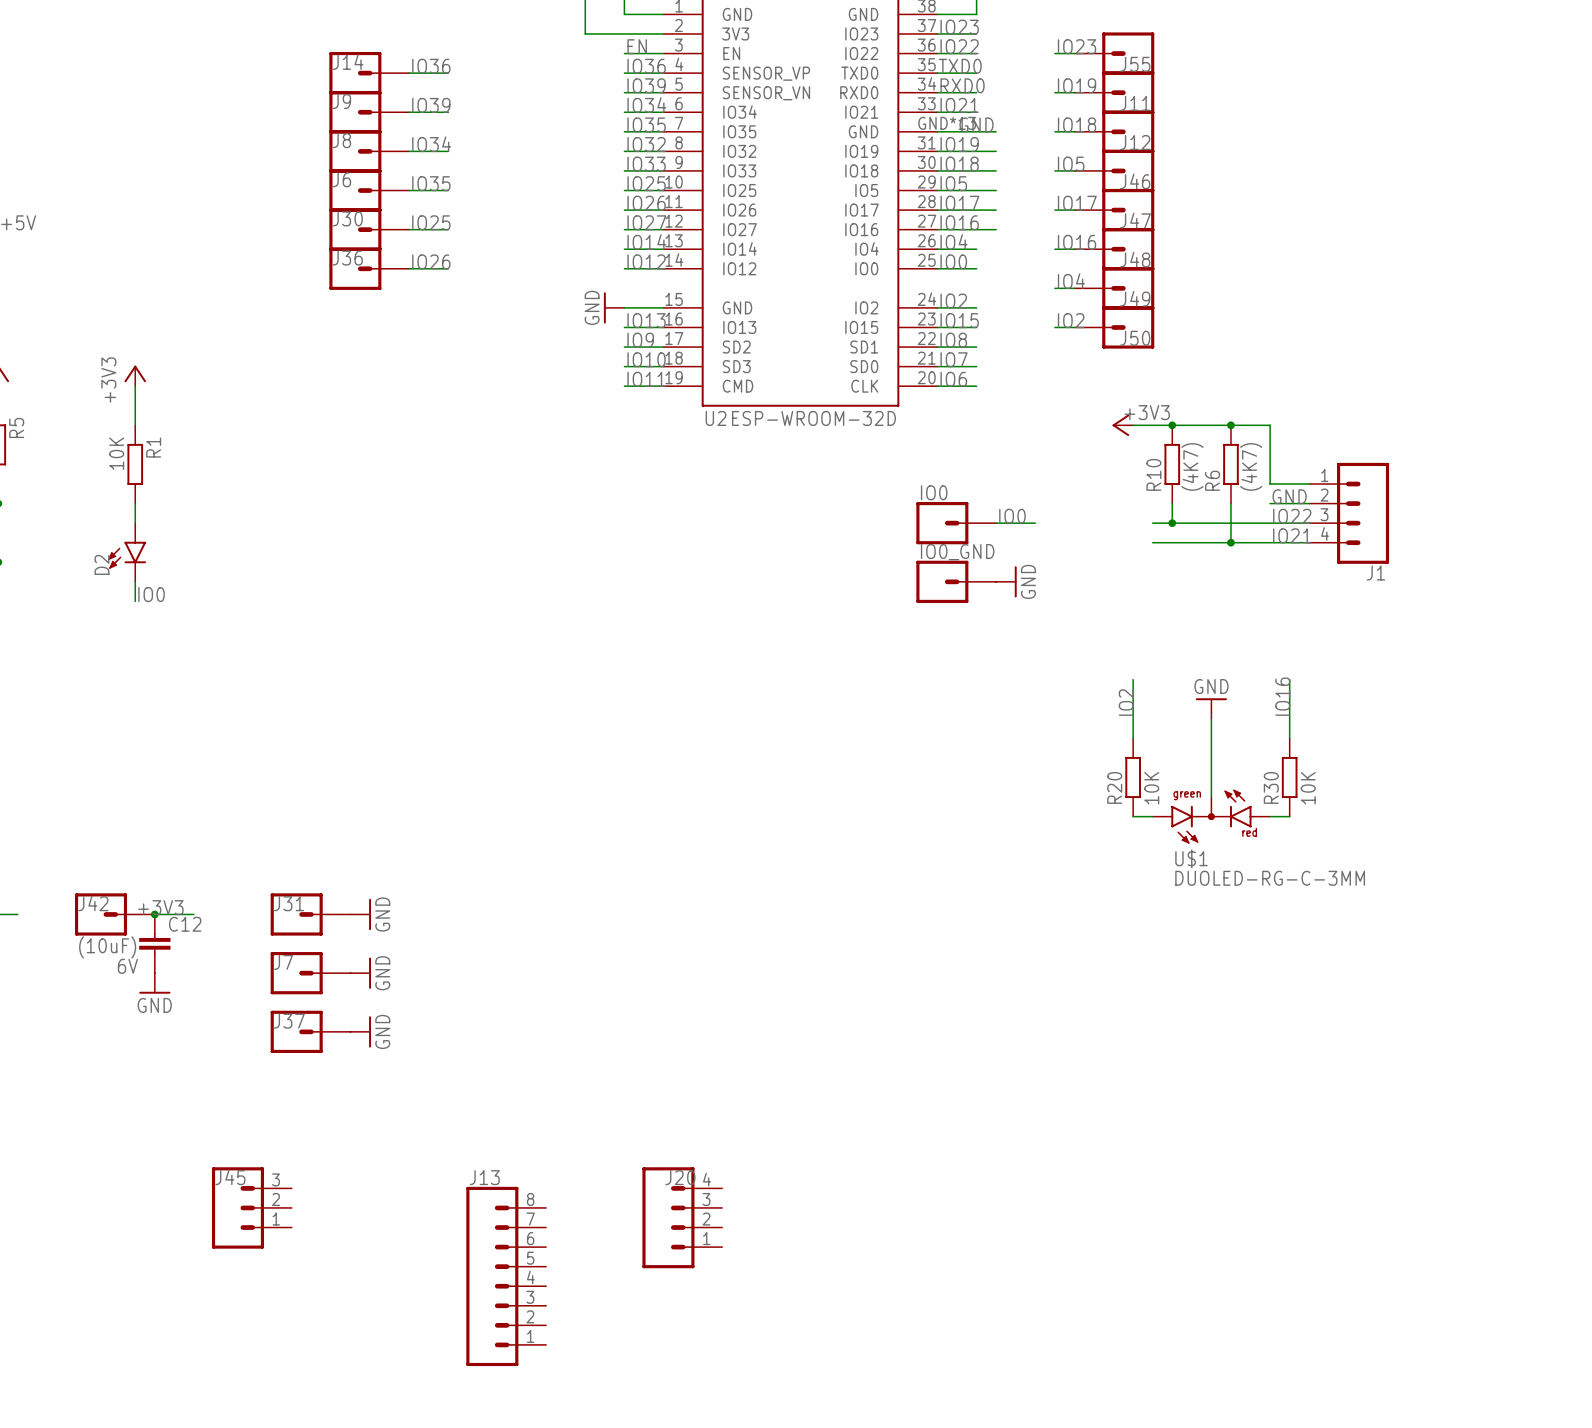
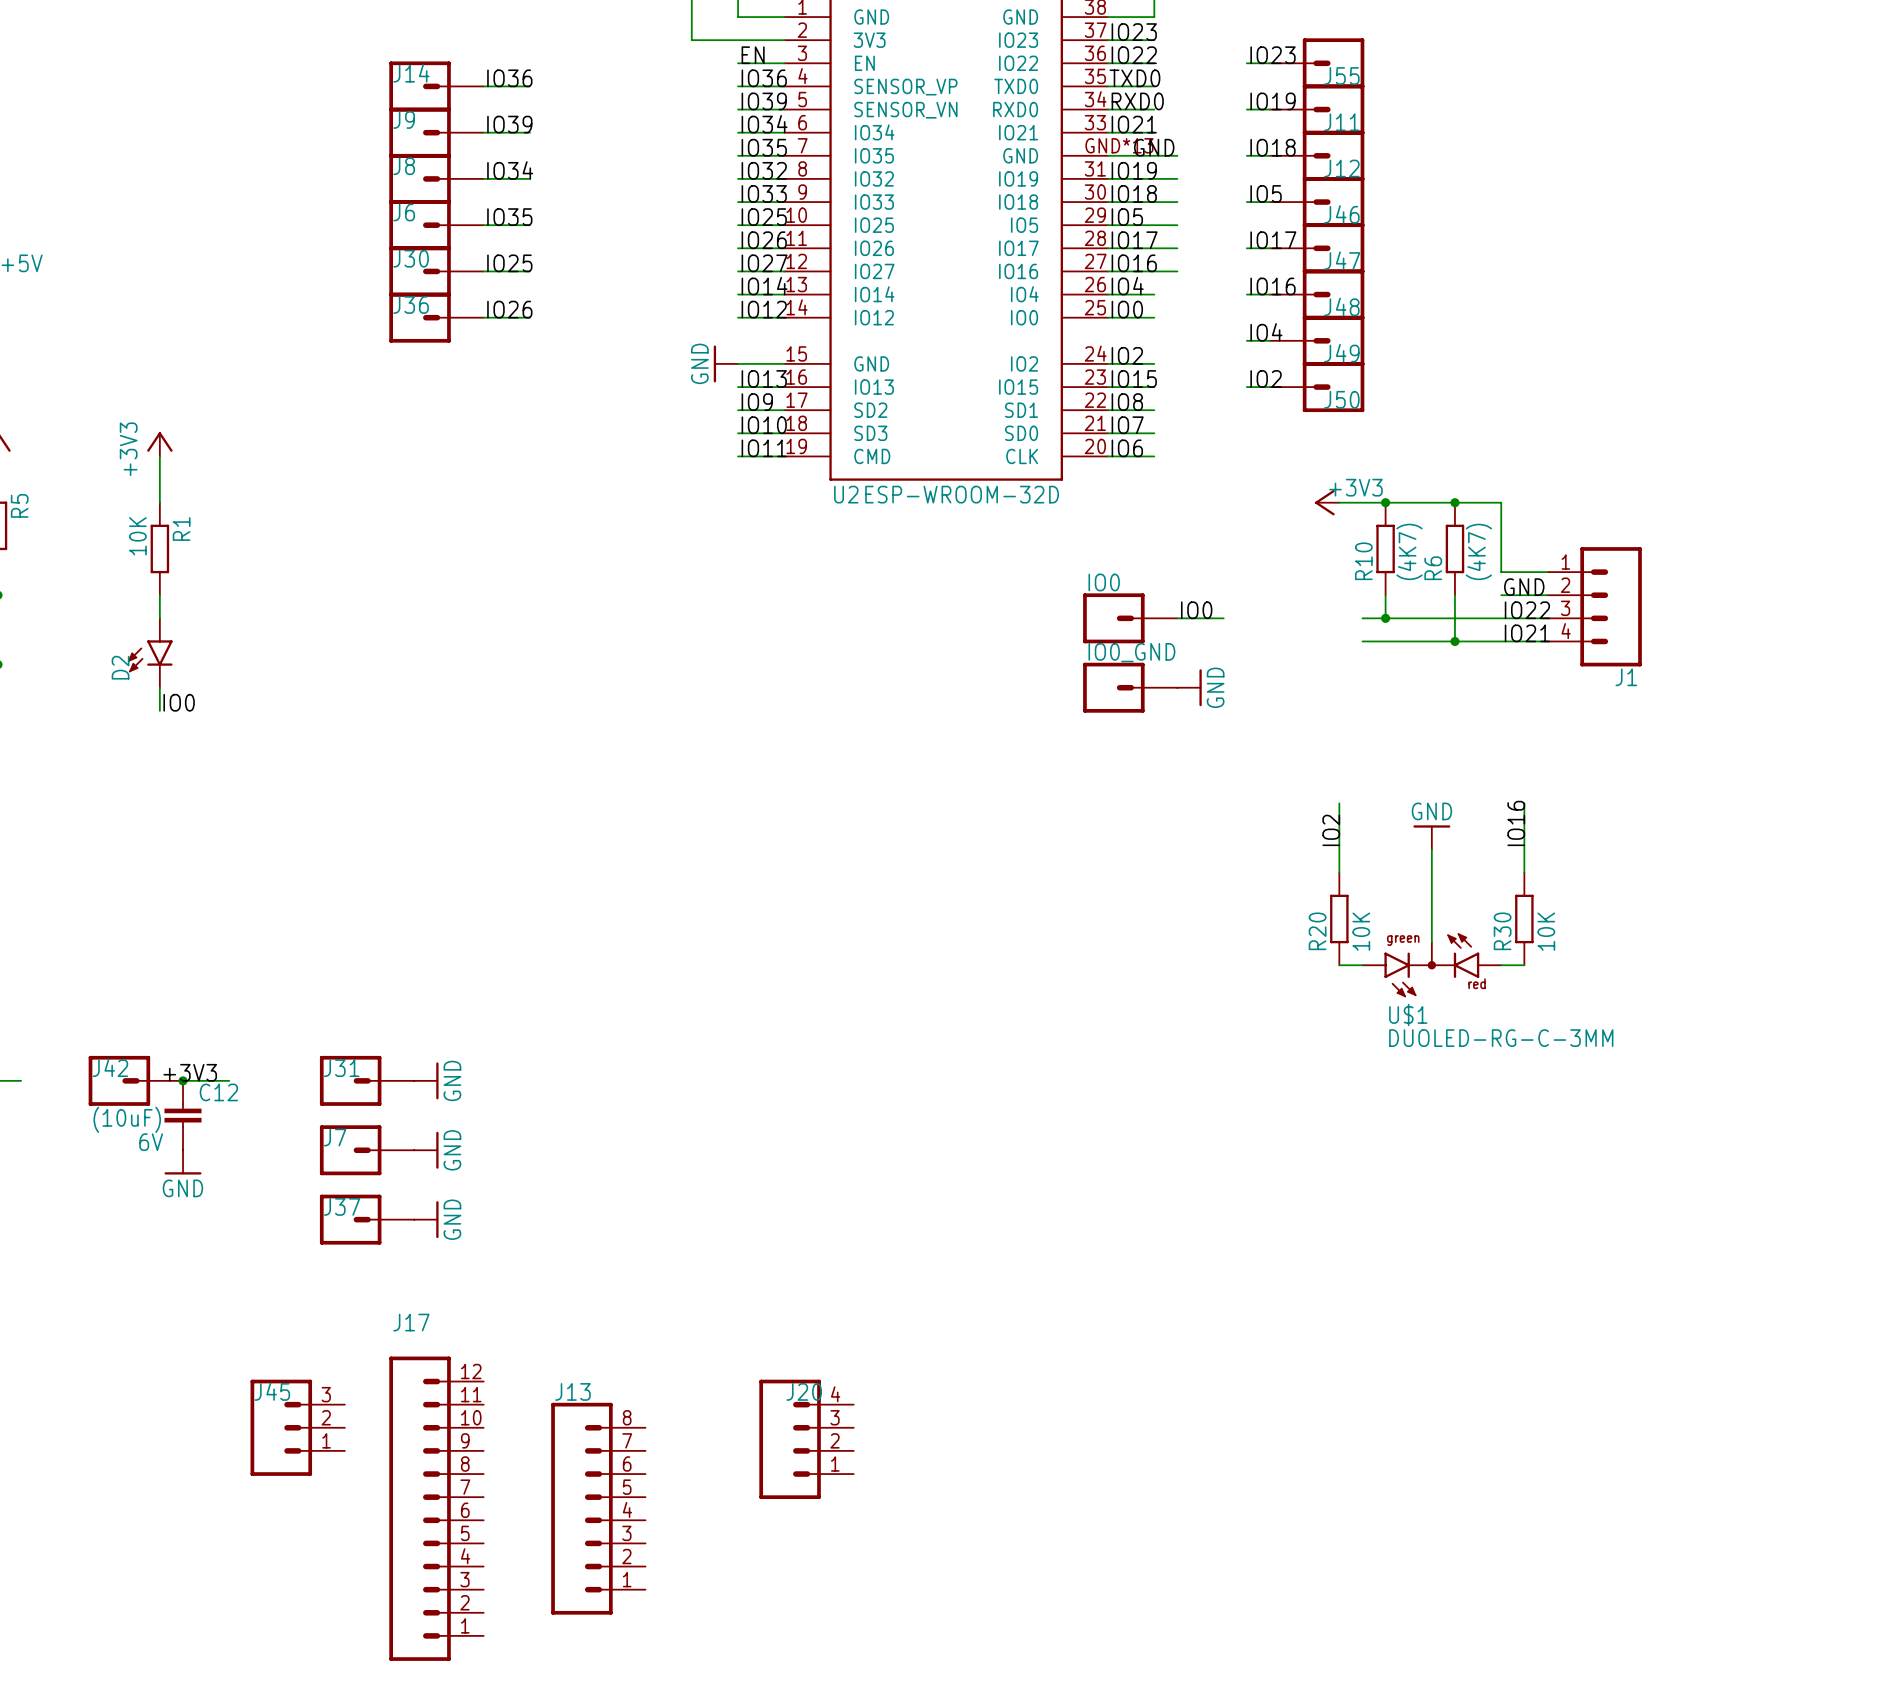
J17: none -> (436, 1508)

